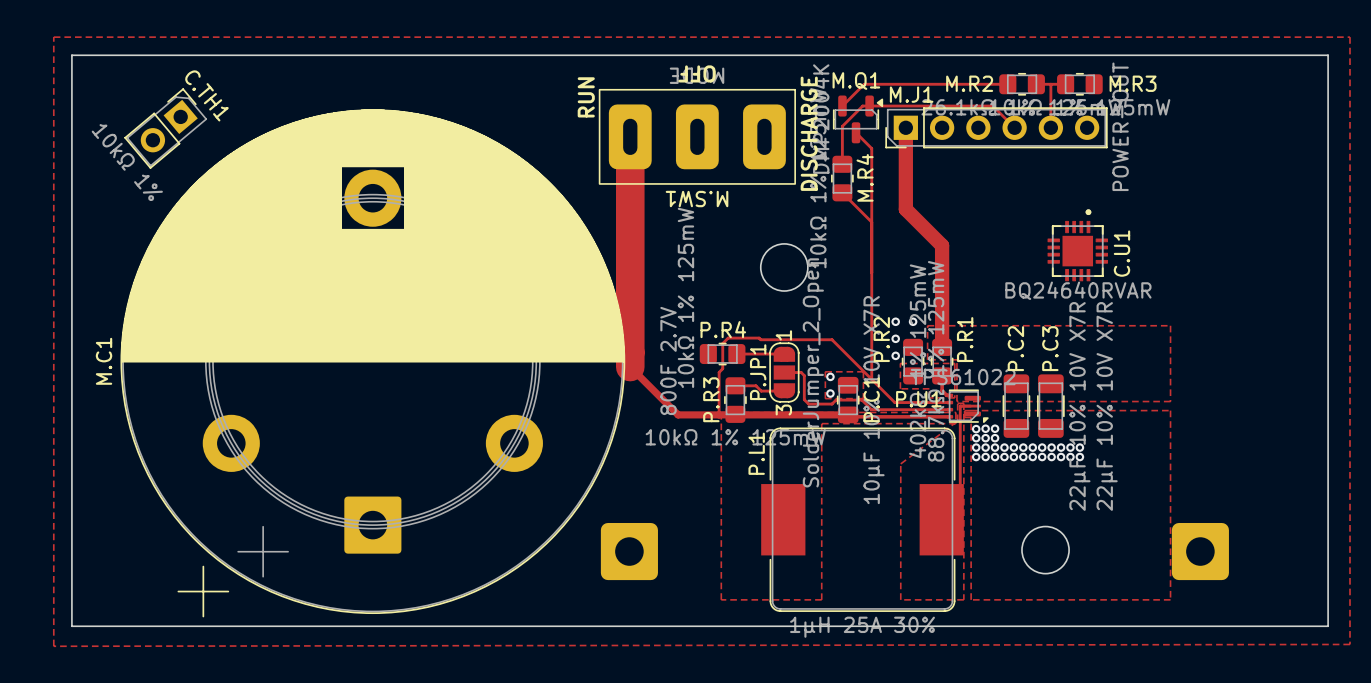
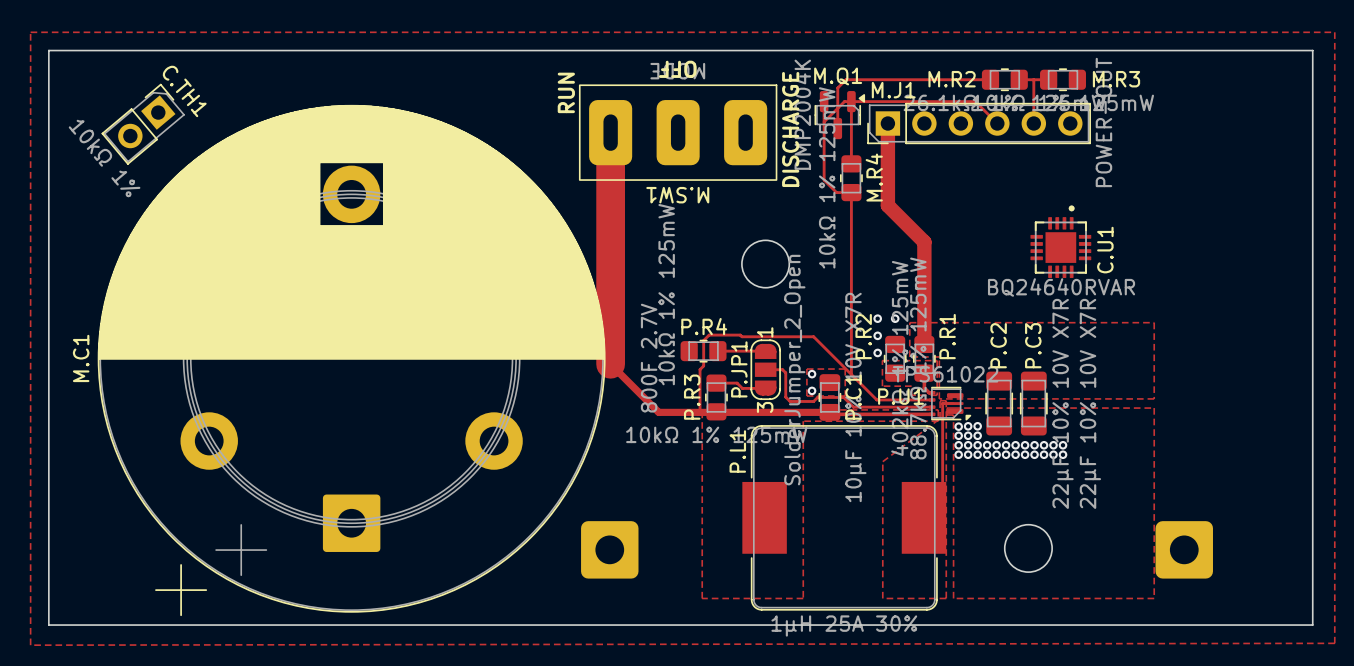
track: (856, 92) (842, 106) -> (837, 87) (837, 128)
track: none -> (851, 101) (851, 163)
track: (856, 132) (871, 148) (871, 379) -> none
track: none -> (824, 160) (824, 180) (836, 192) (851, 192) (851, 374)
M.R4 position: (842, 178) -> (851, 178)
track: (842, 192) (871, 222) -> none

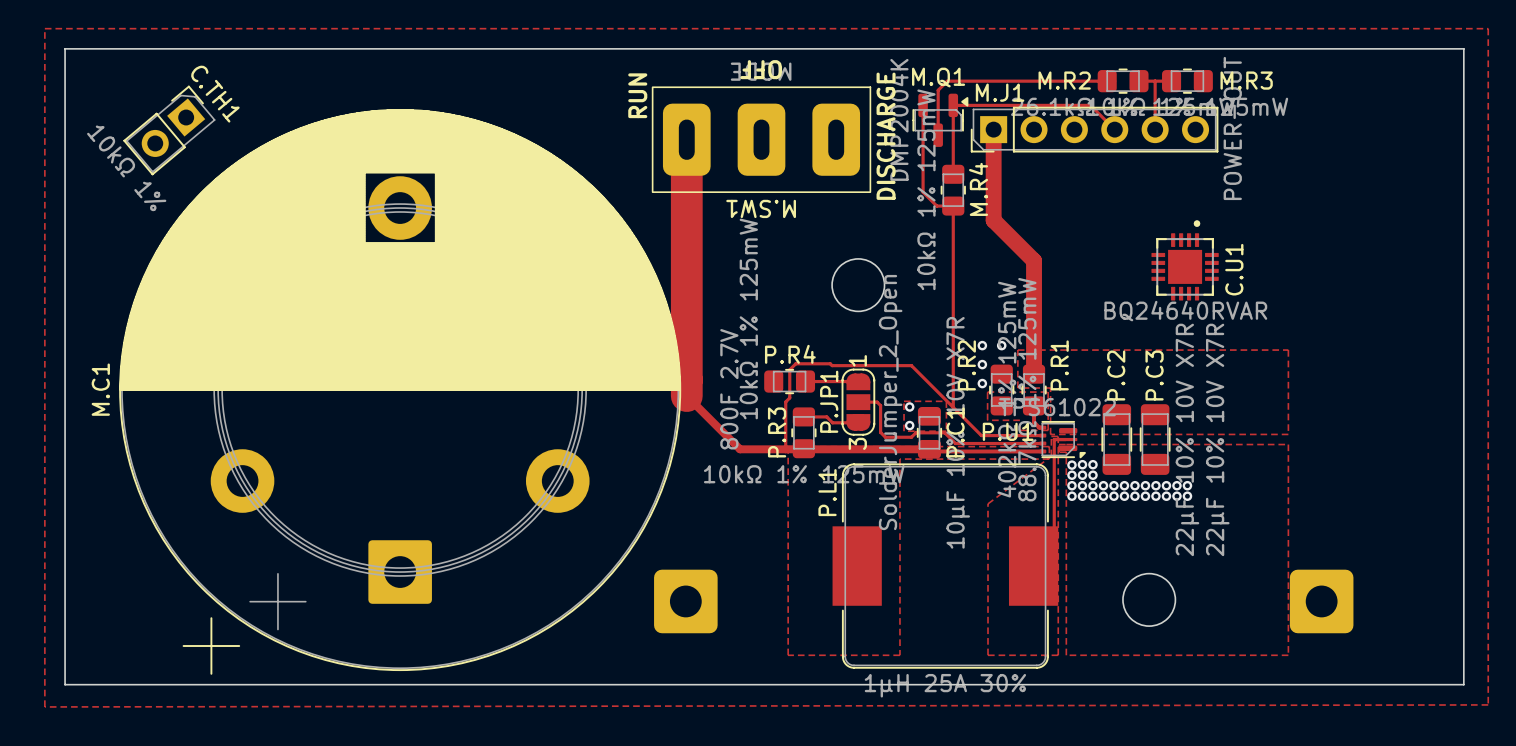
track: (851, 101) (844, 101) (824, 122) -> none

